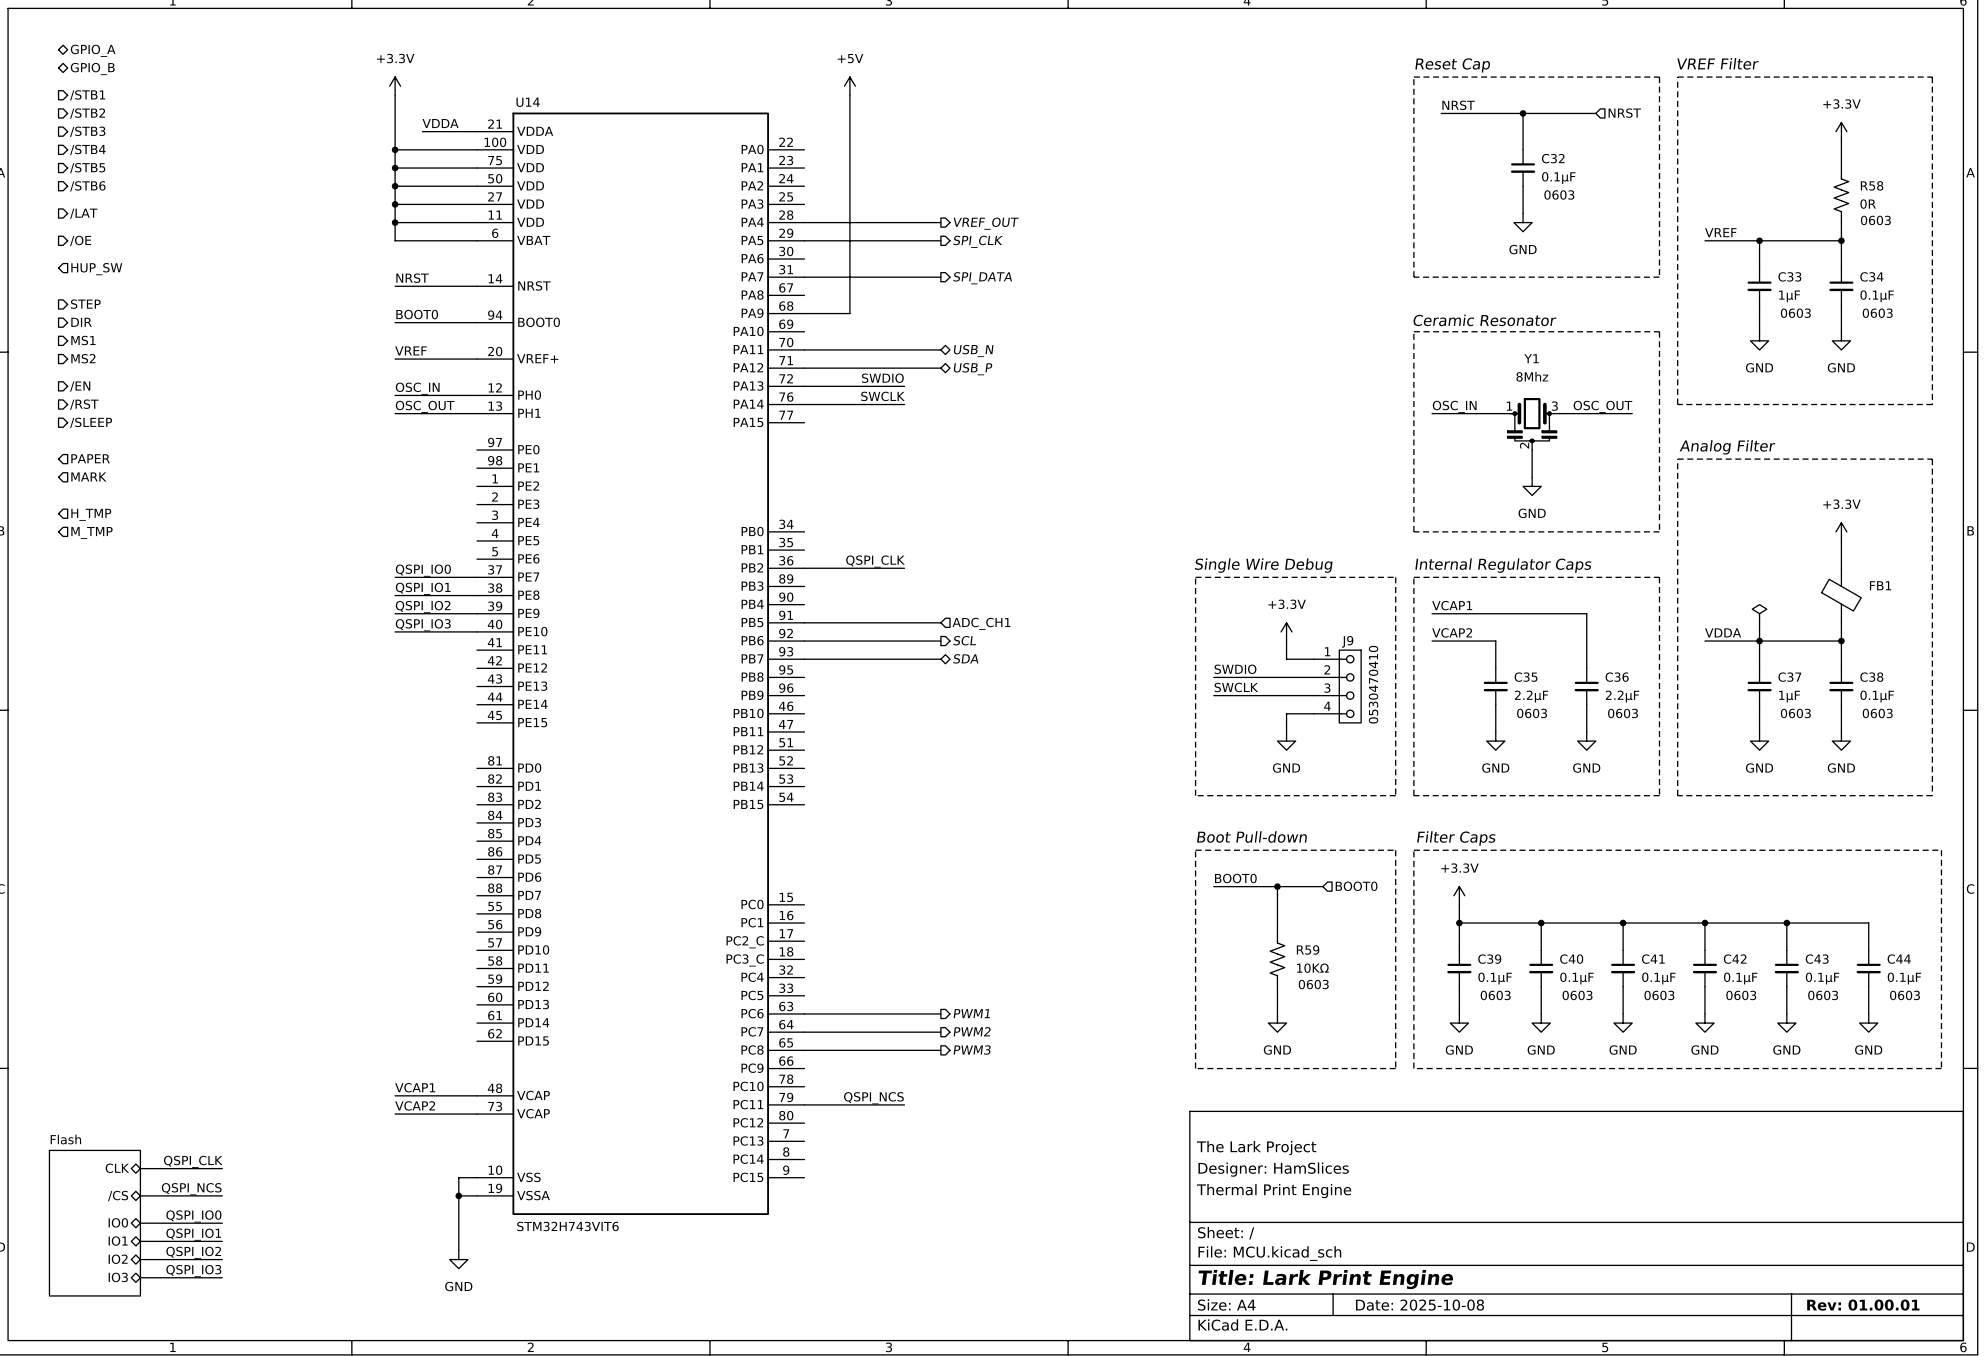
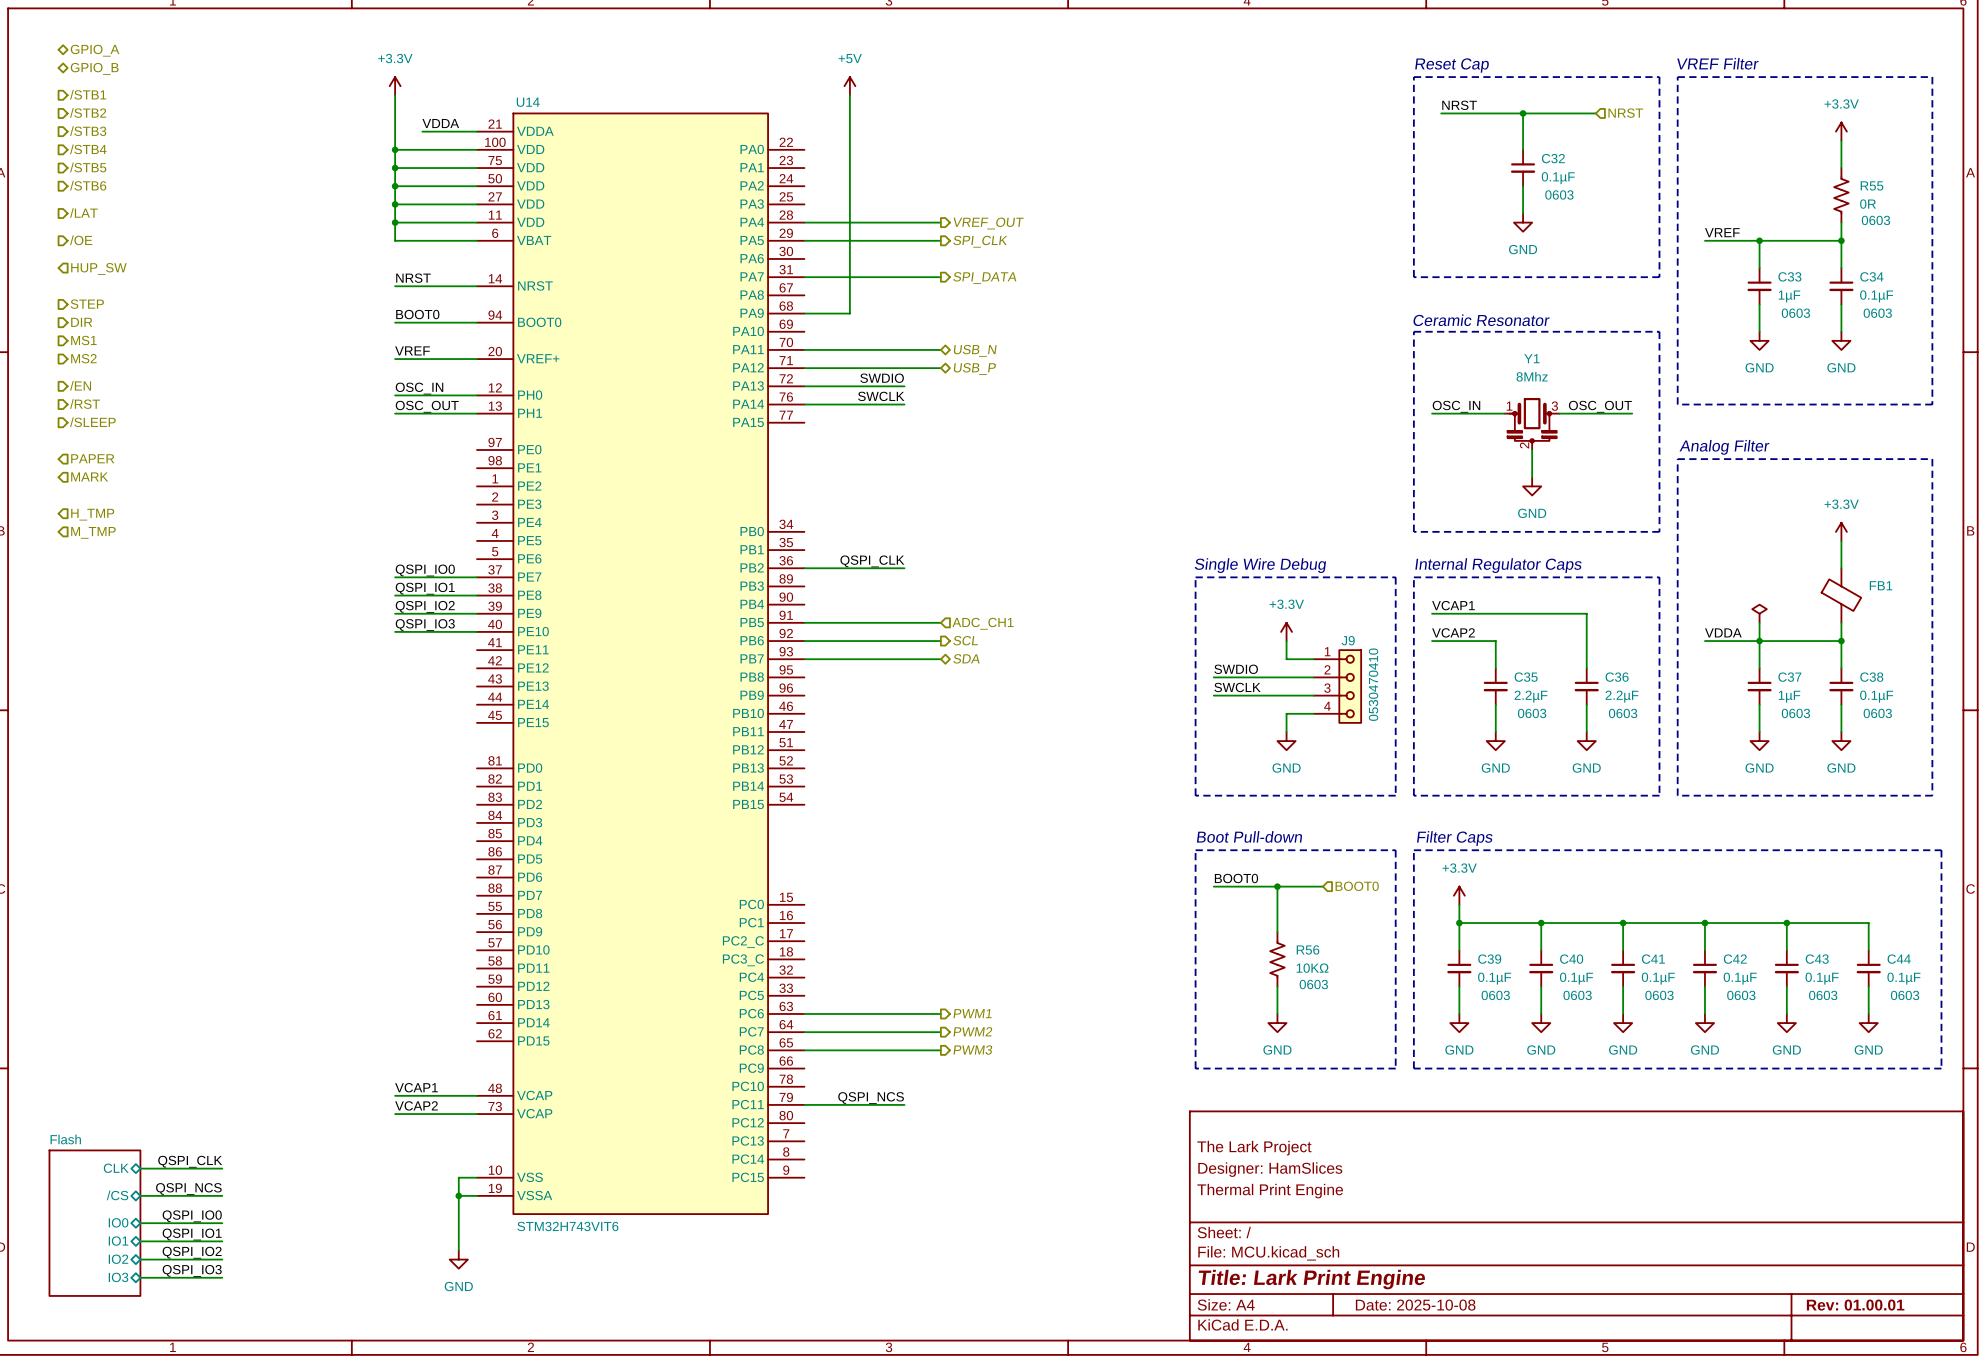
R58 name: R58 (1872, 185) -> R55 (1872, 185)
R59 name: R59 (1308, 949) -> R56 (1308, 949)

